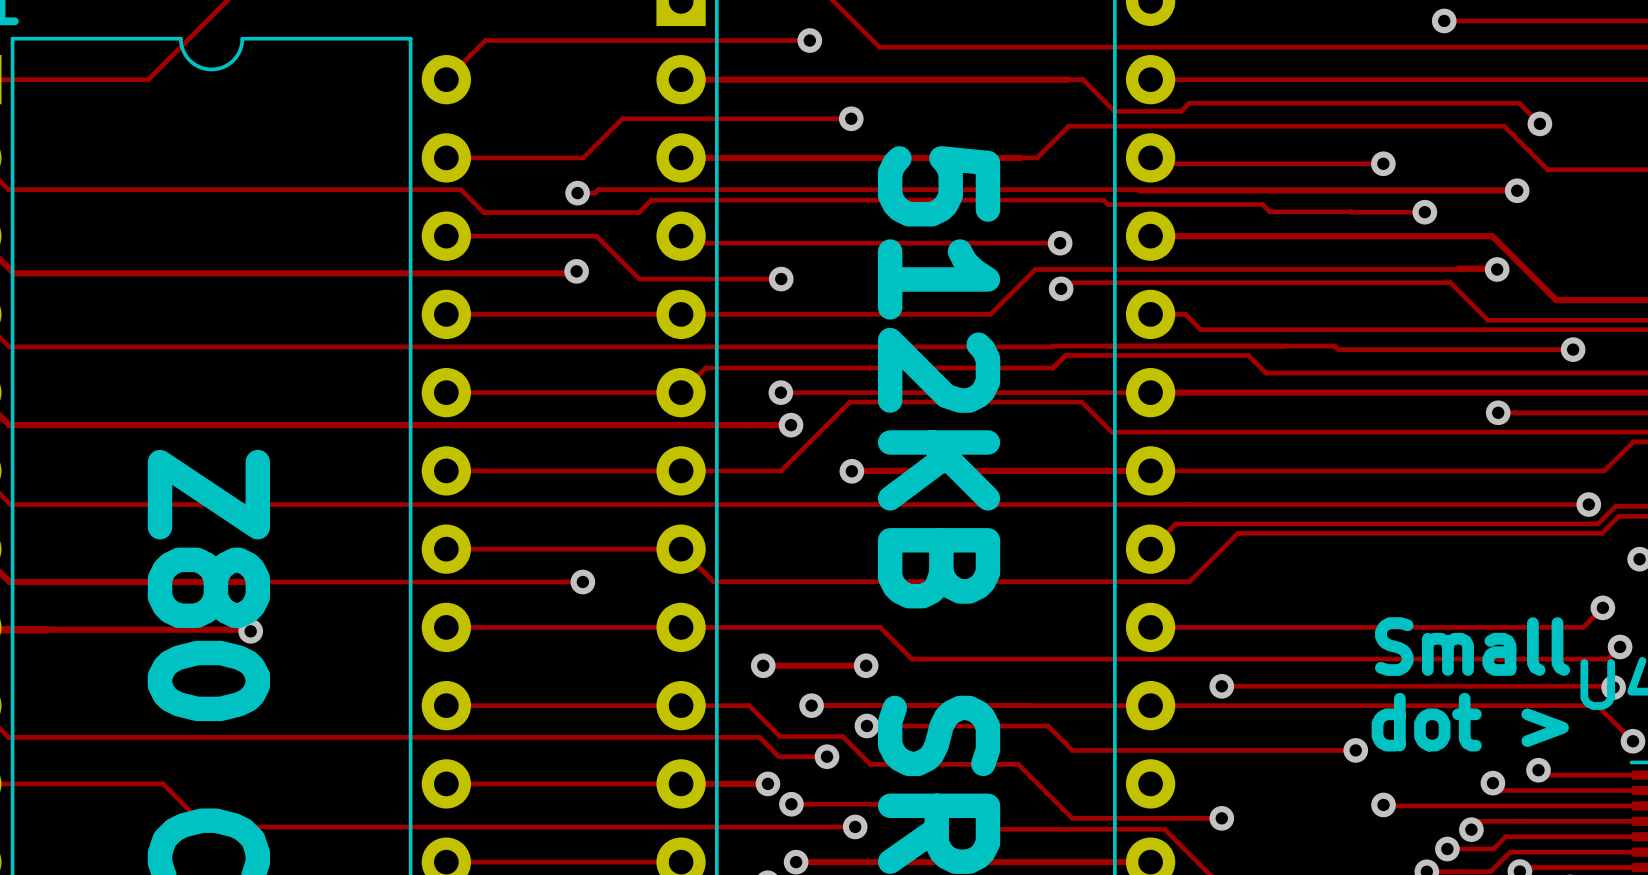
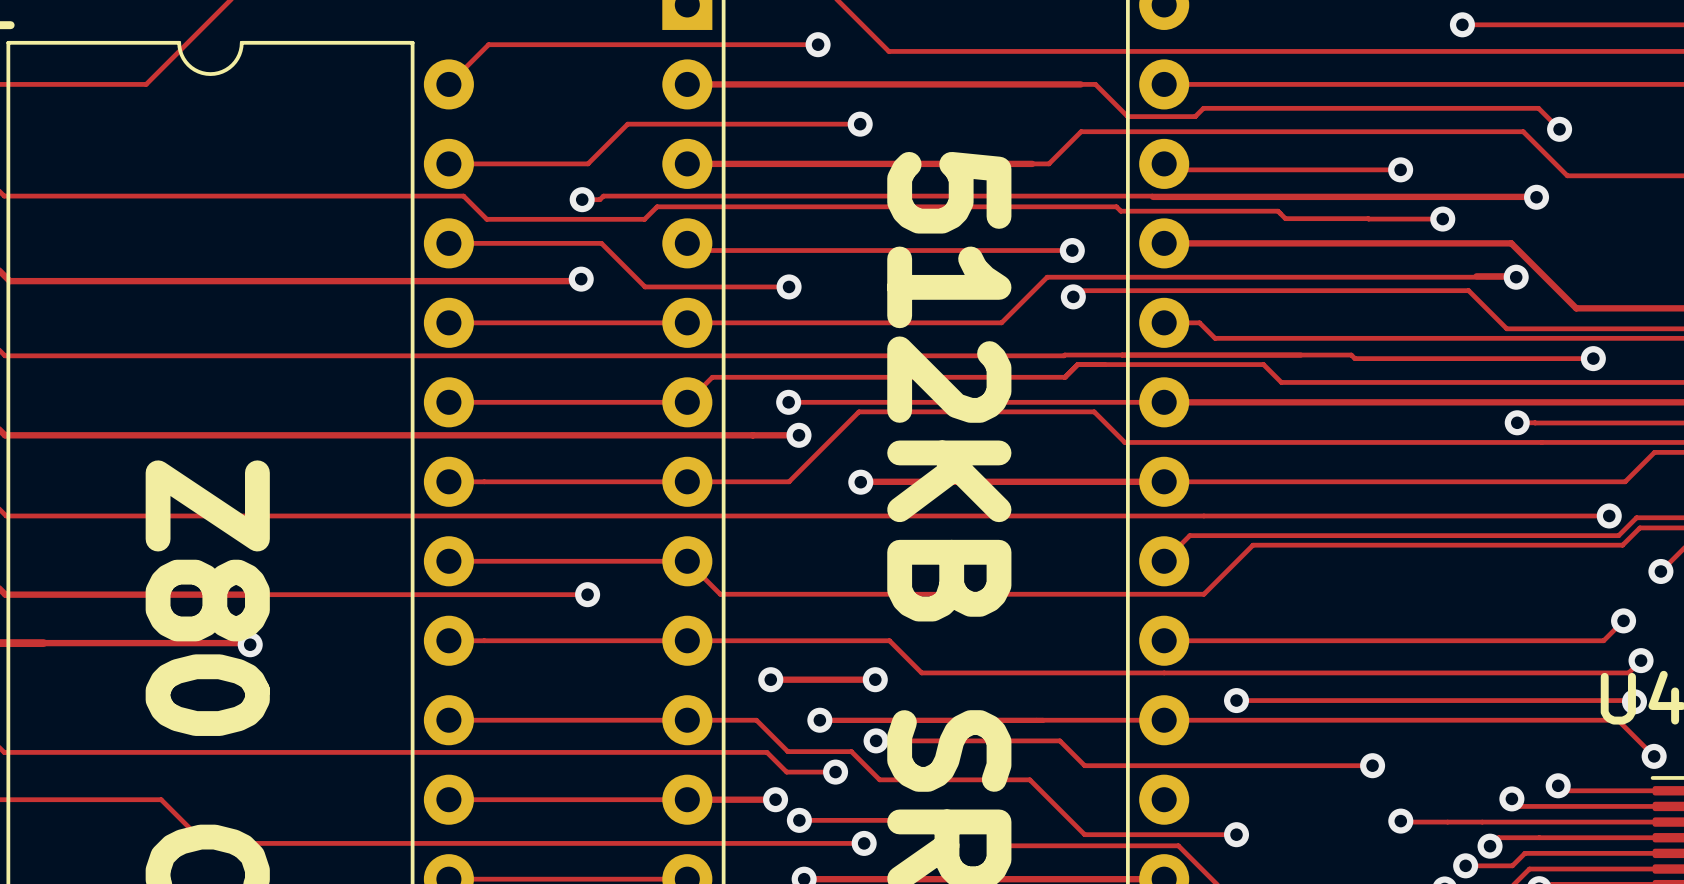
text: Small (1472, 646) -> none
text: dot > (1470, 722) -> none

